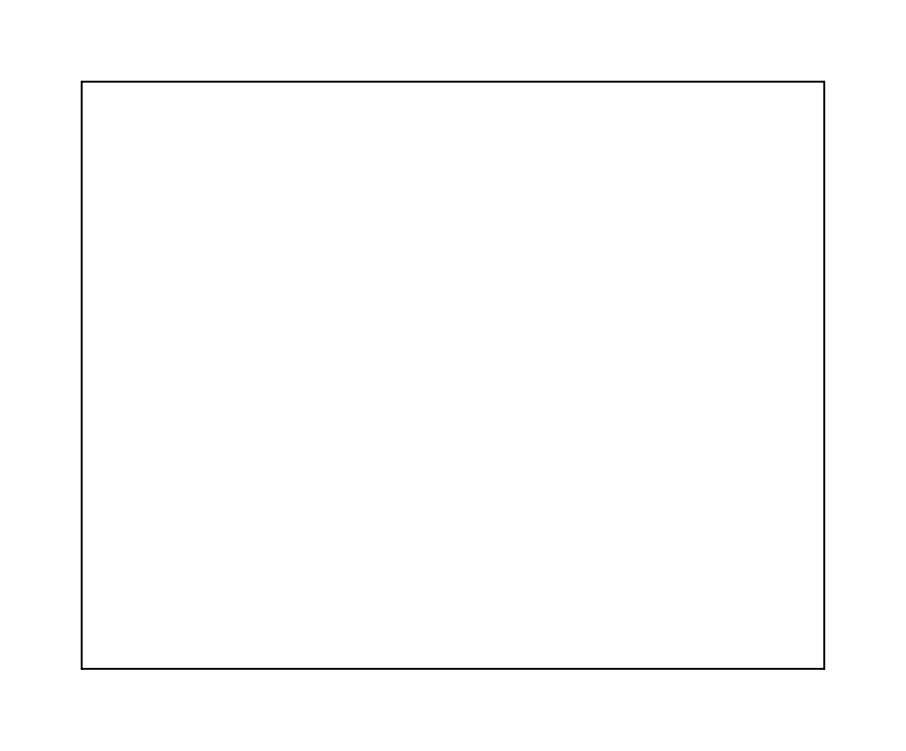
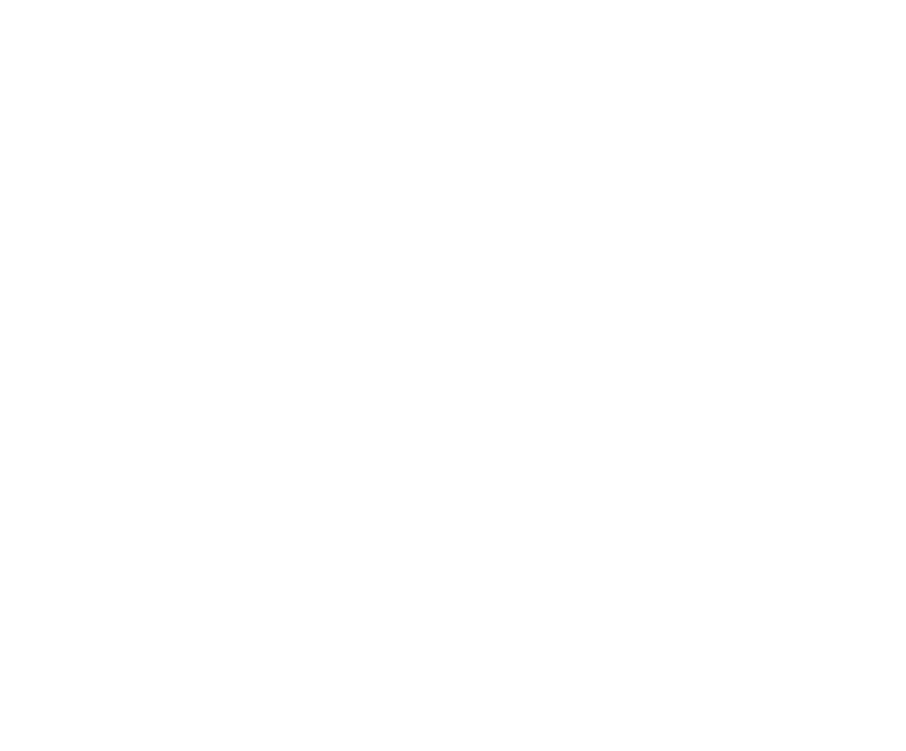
board edge: (824, 81) (81, 81) (81, 668) (824, 668) (824, 81) -> none

